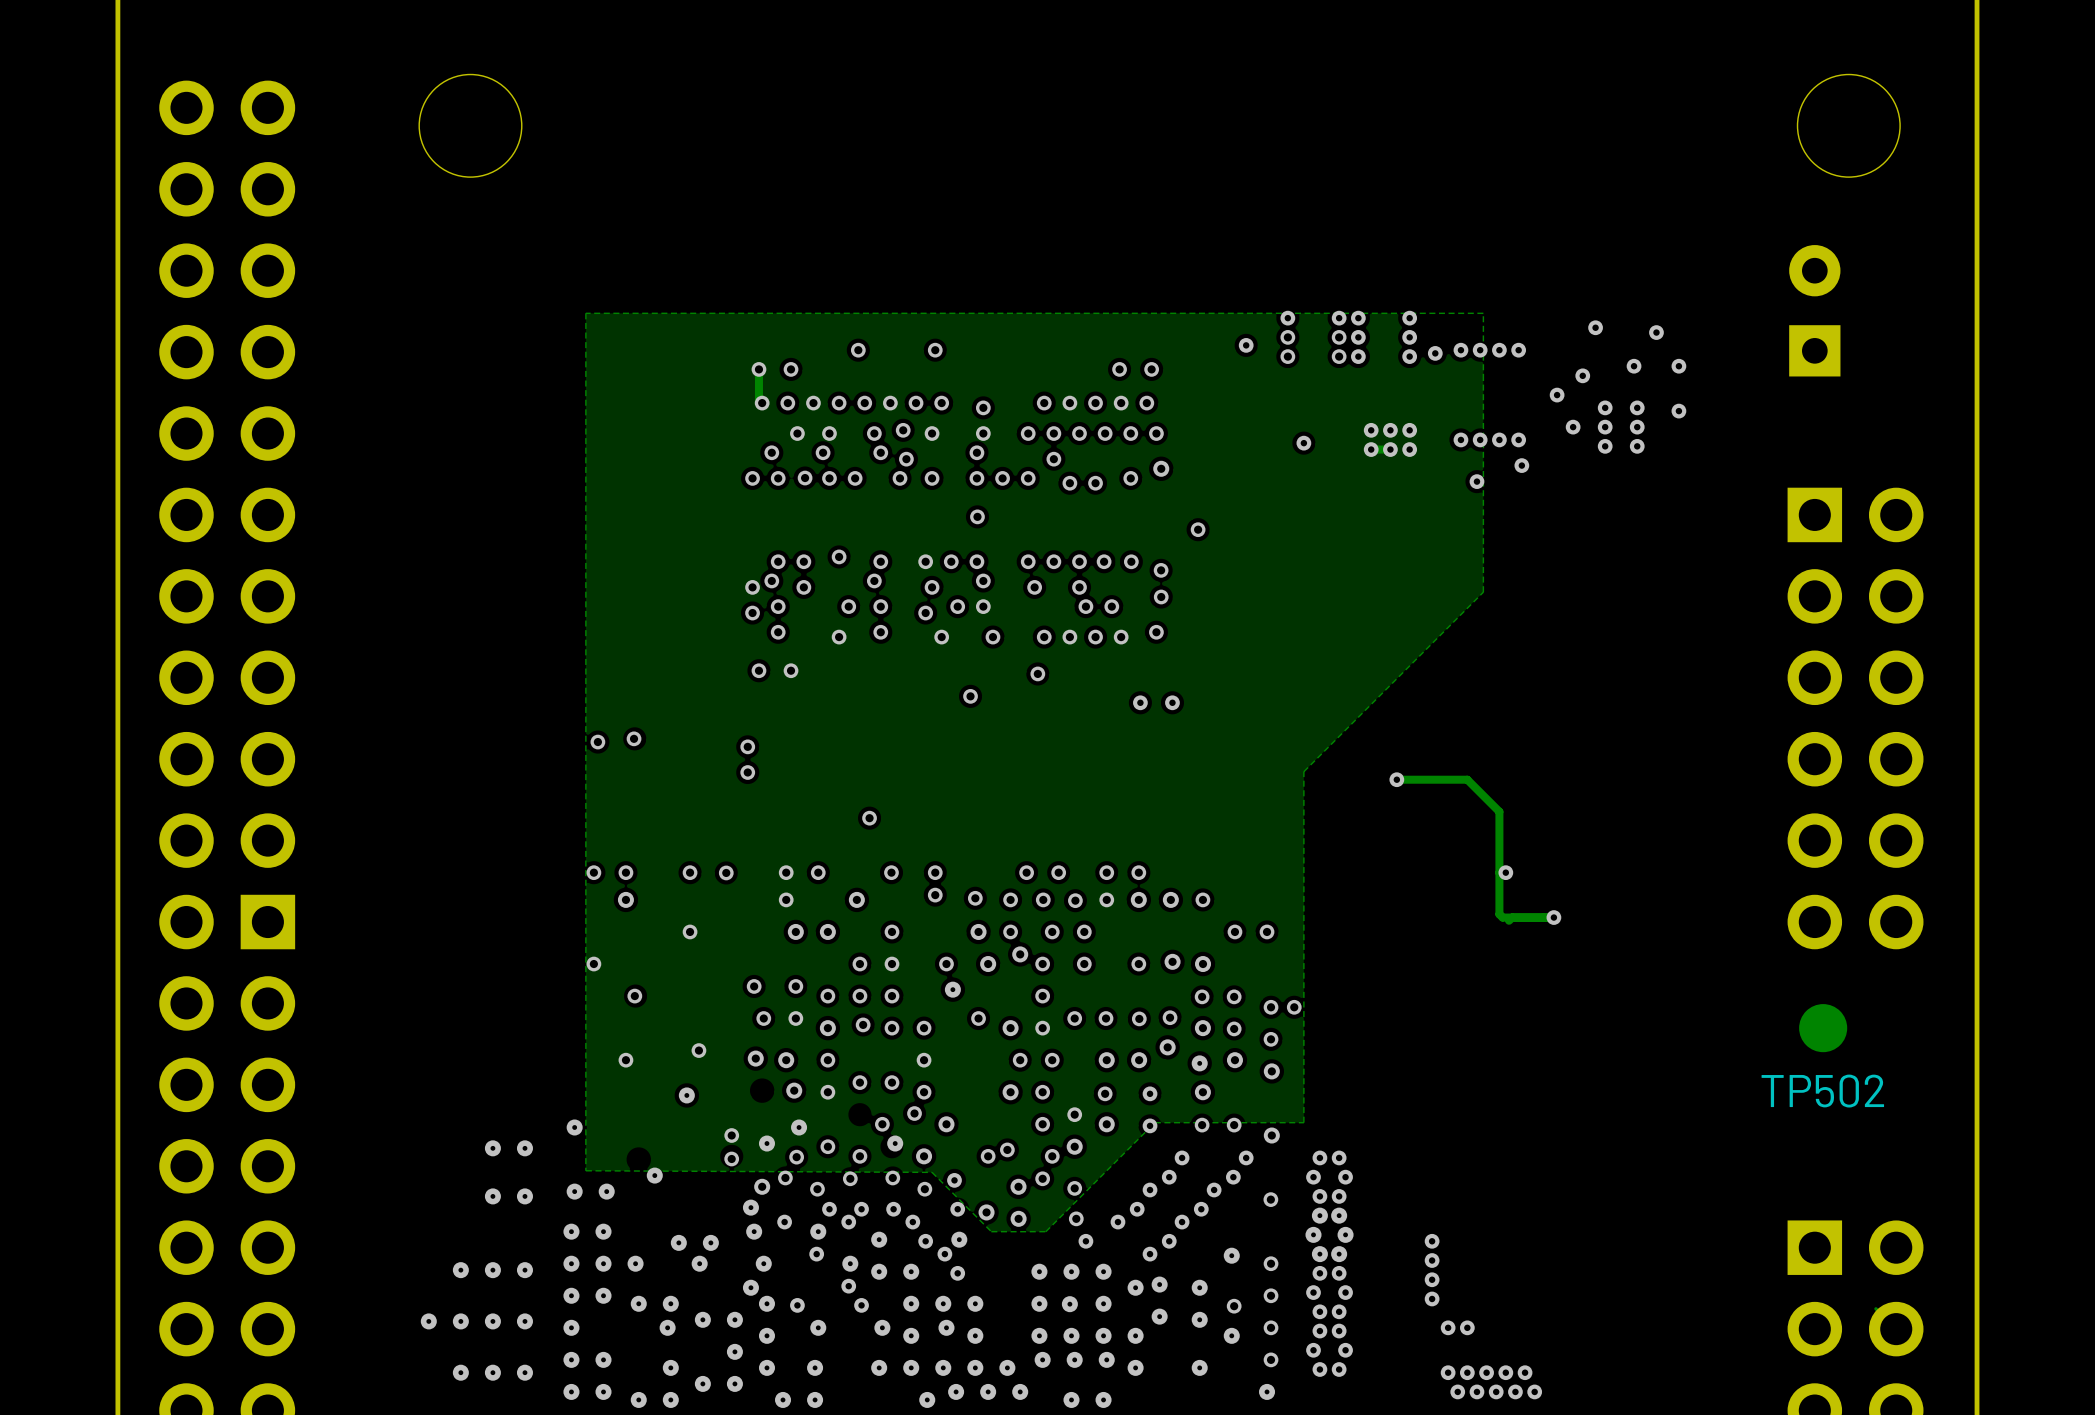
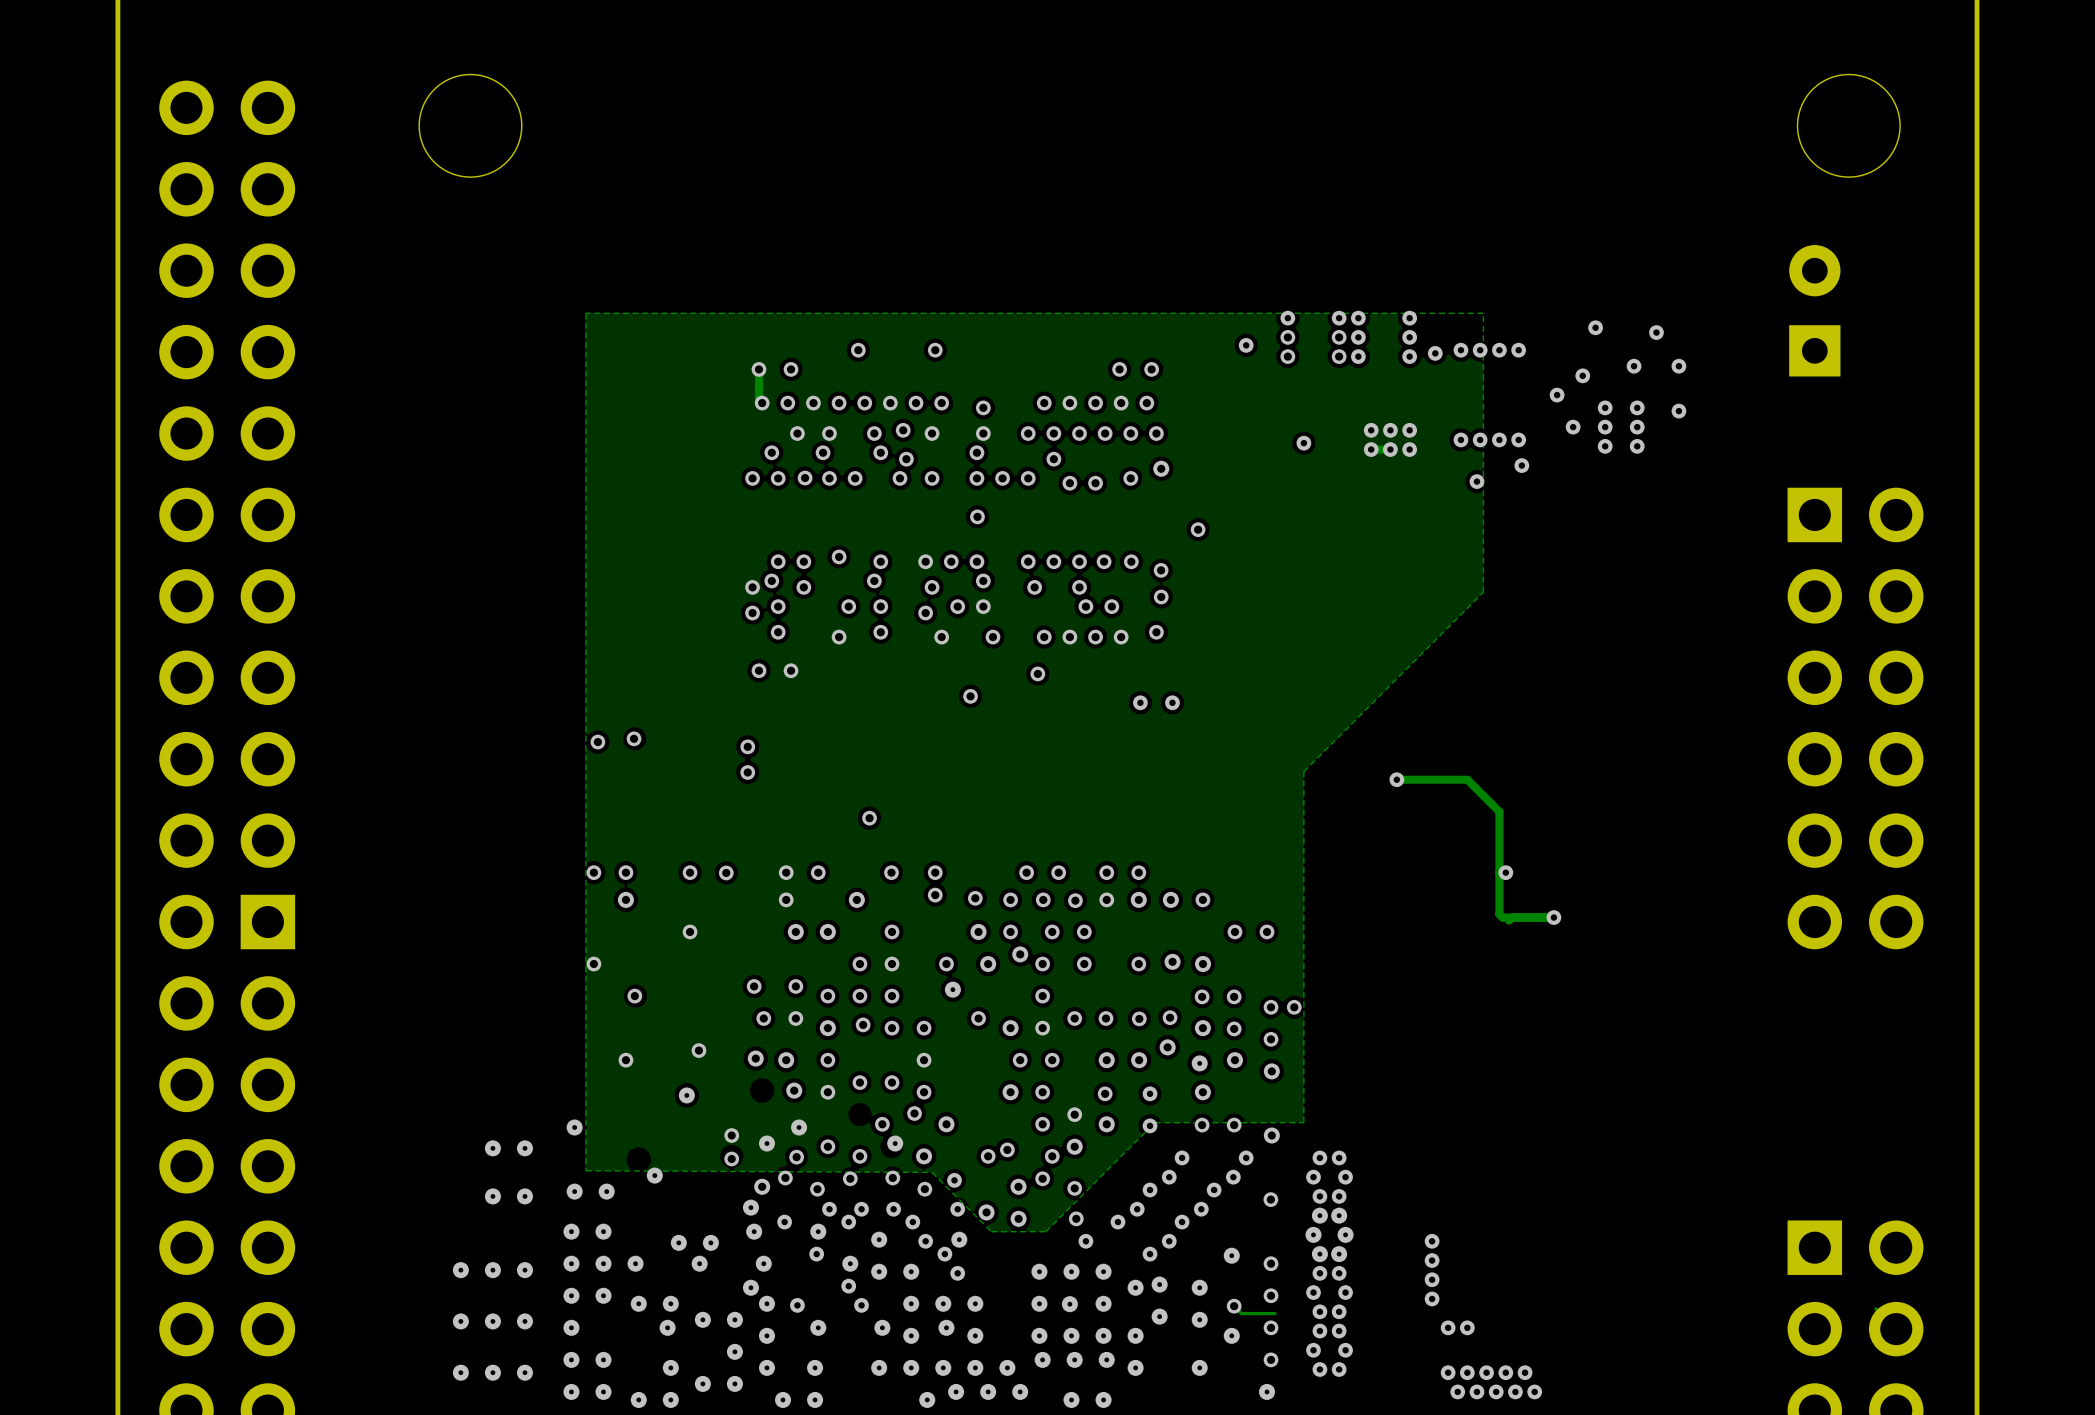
TP502: (1823, 1028) -> none
track: none -> (1234, 1306) (1241, 1313) (1274, 1313)
via: (428, 1321) -> none

